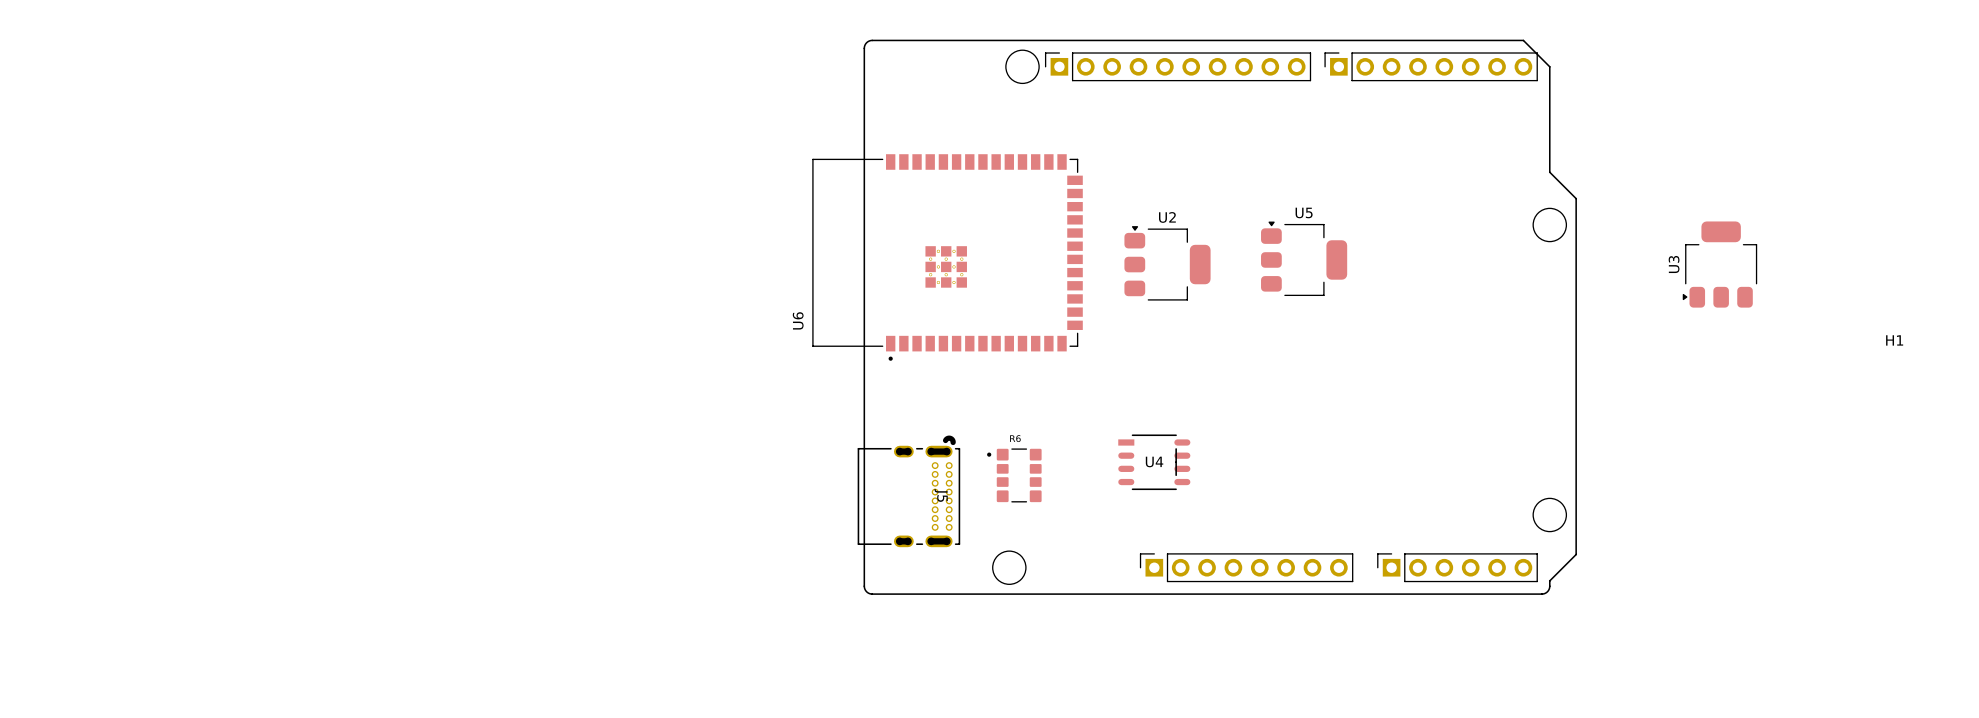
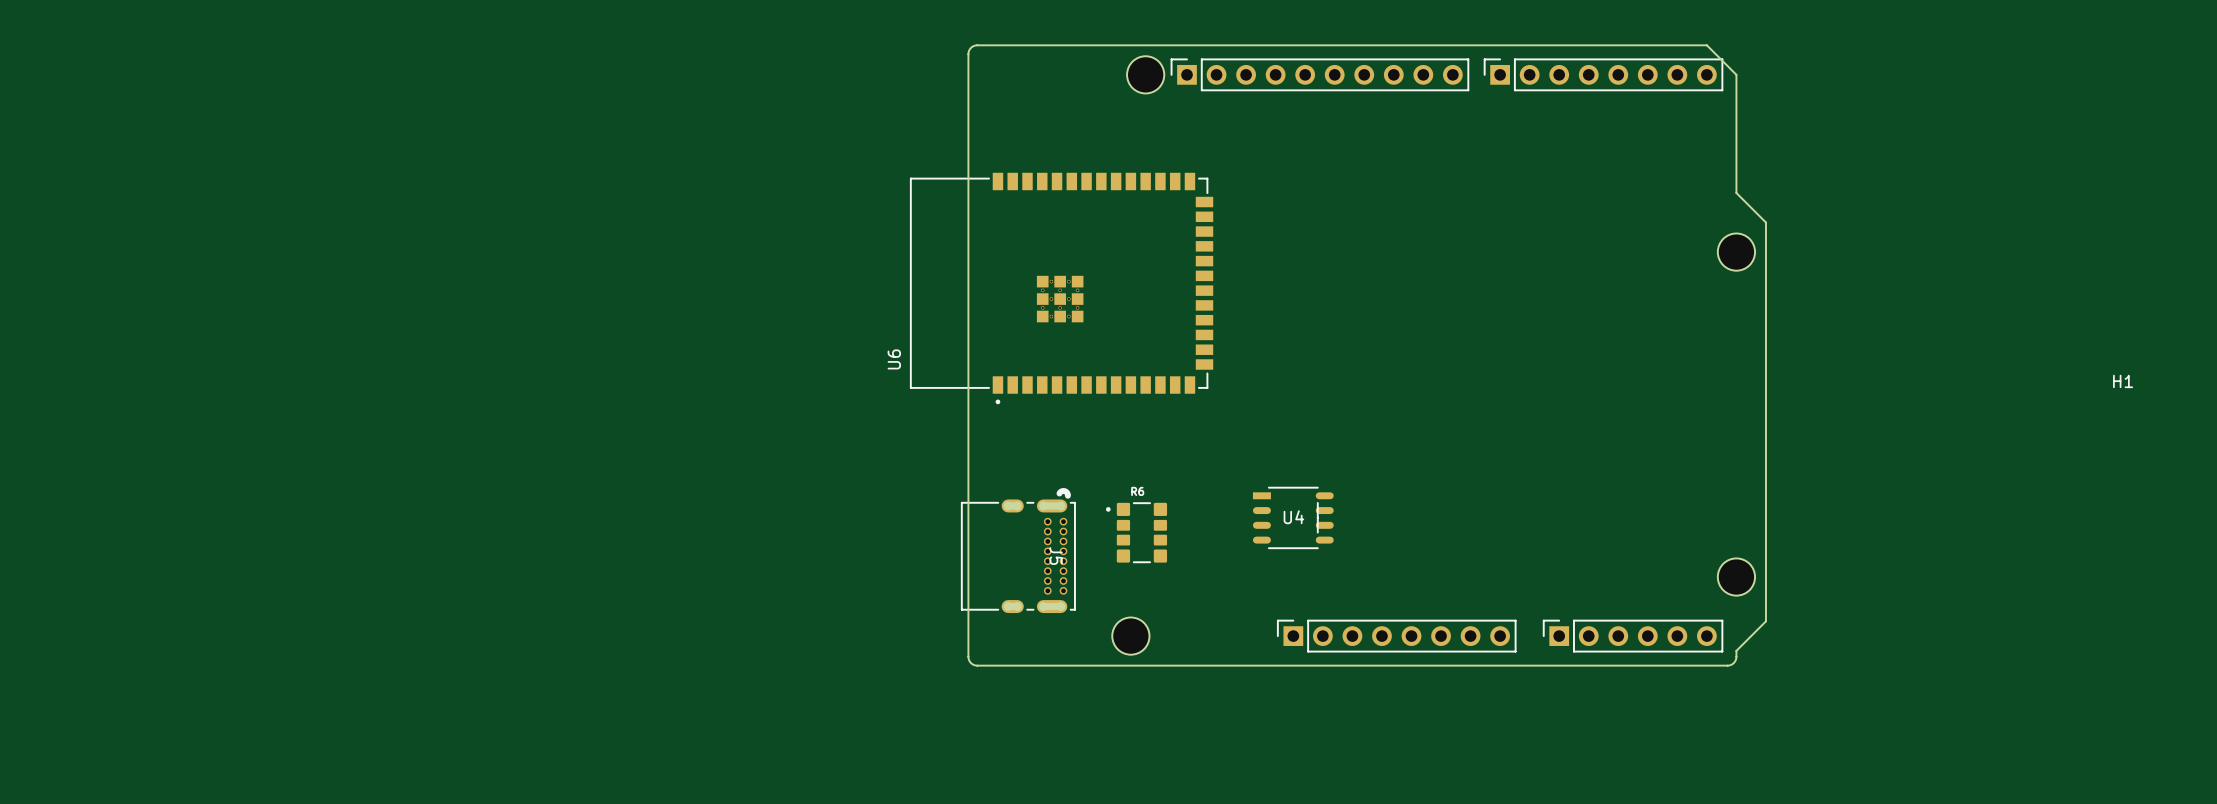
U5: (1304, 258) -> none
U2: (1167, 263) -> none
U3: (1719, 264) -> none

